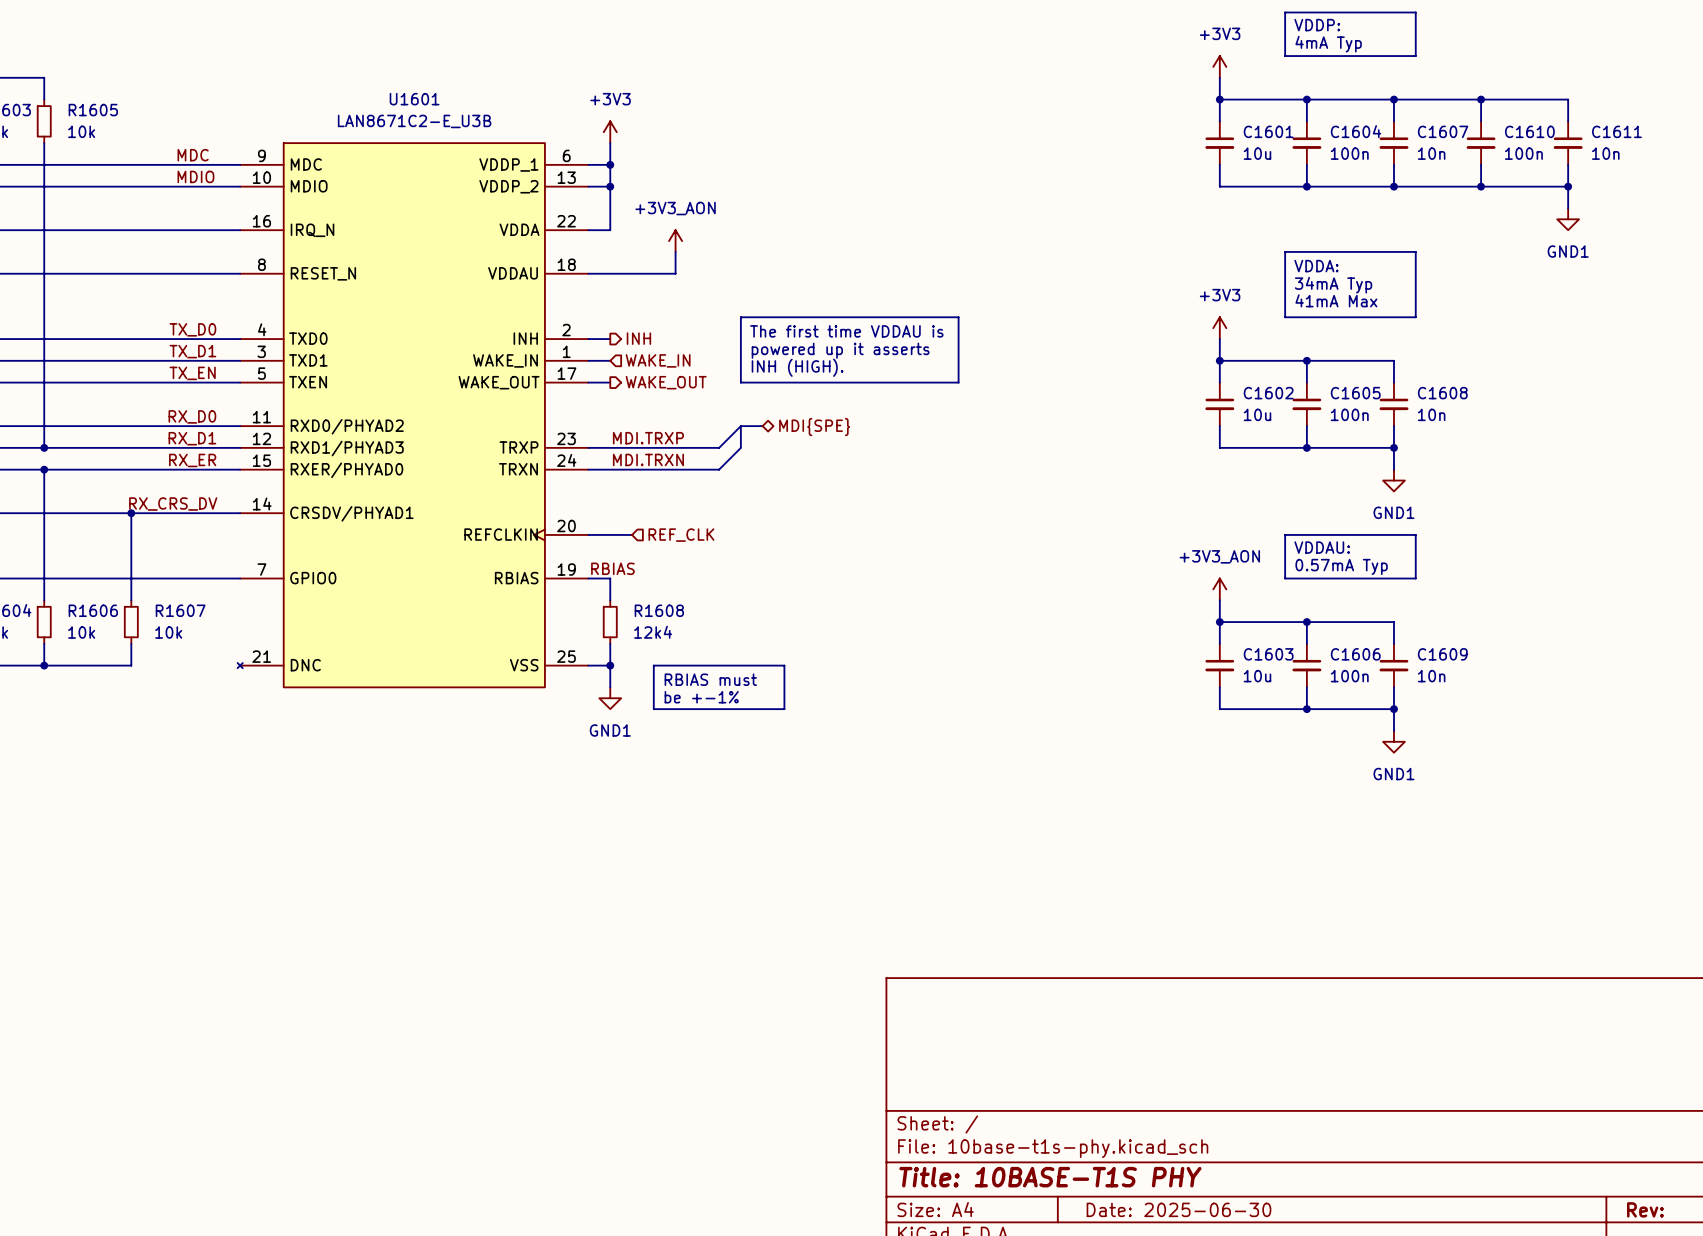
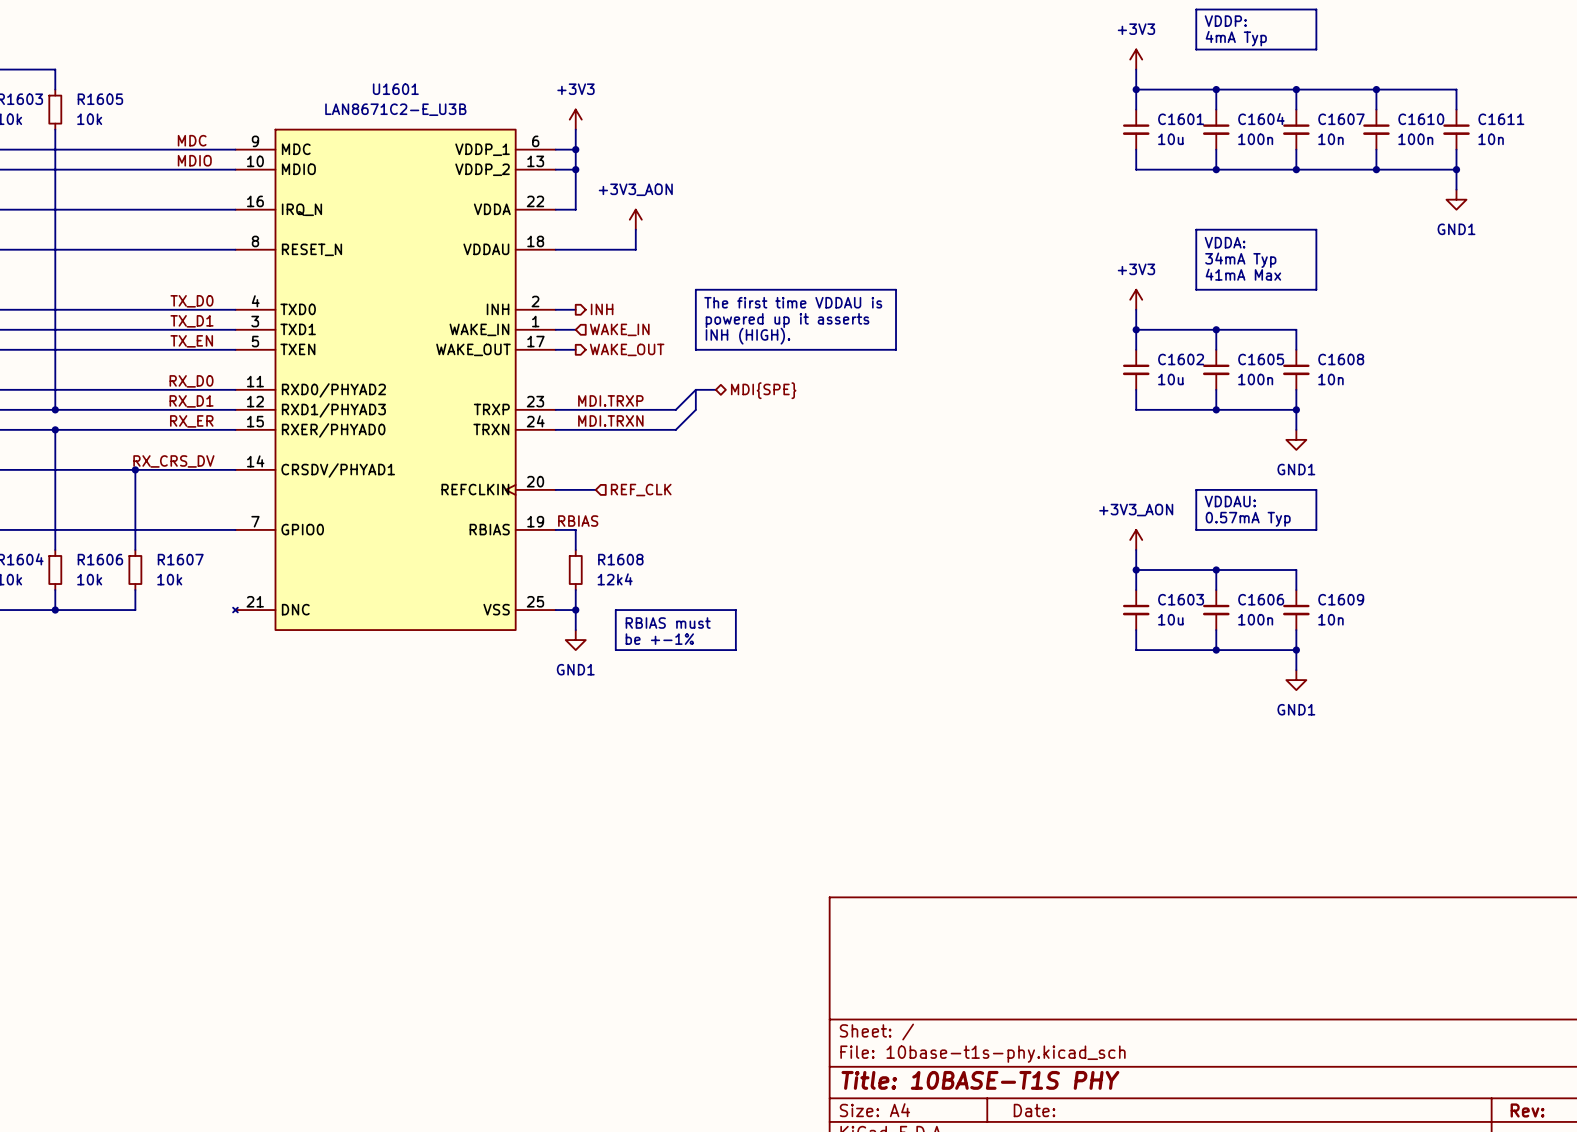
title block: Date: 2025-06-30 (1178, 1209) -> Date: (1034, 1110)

